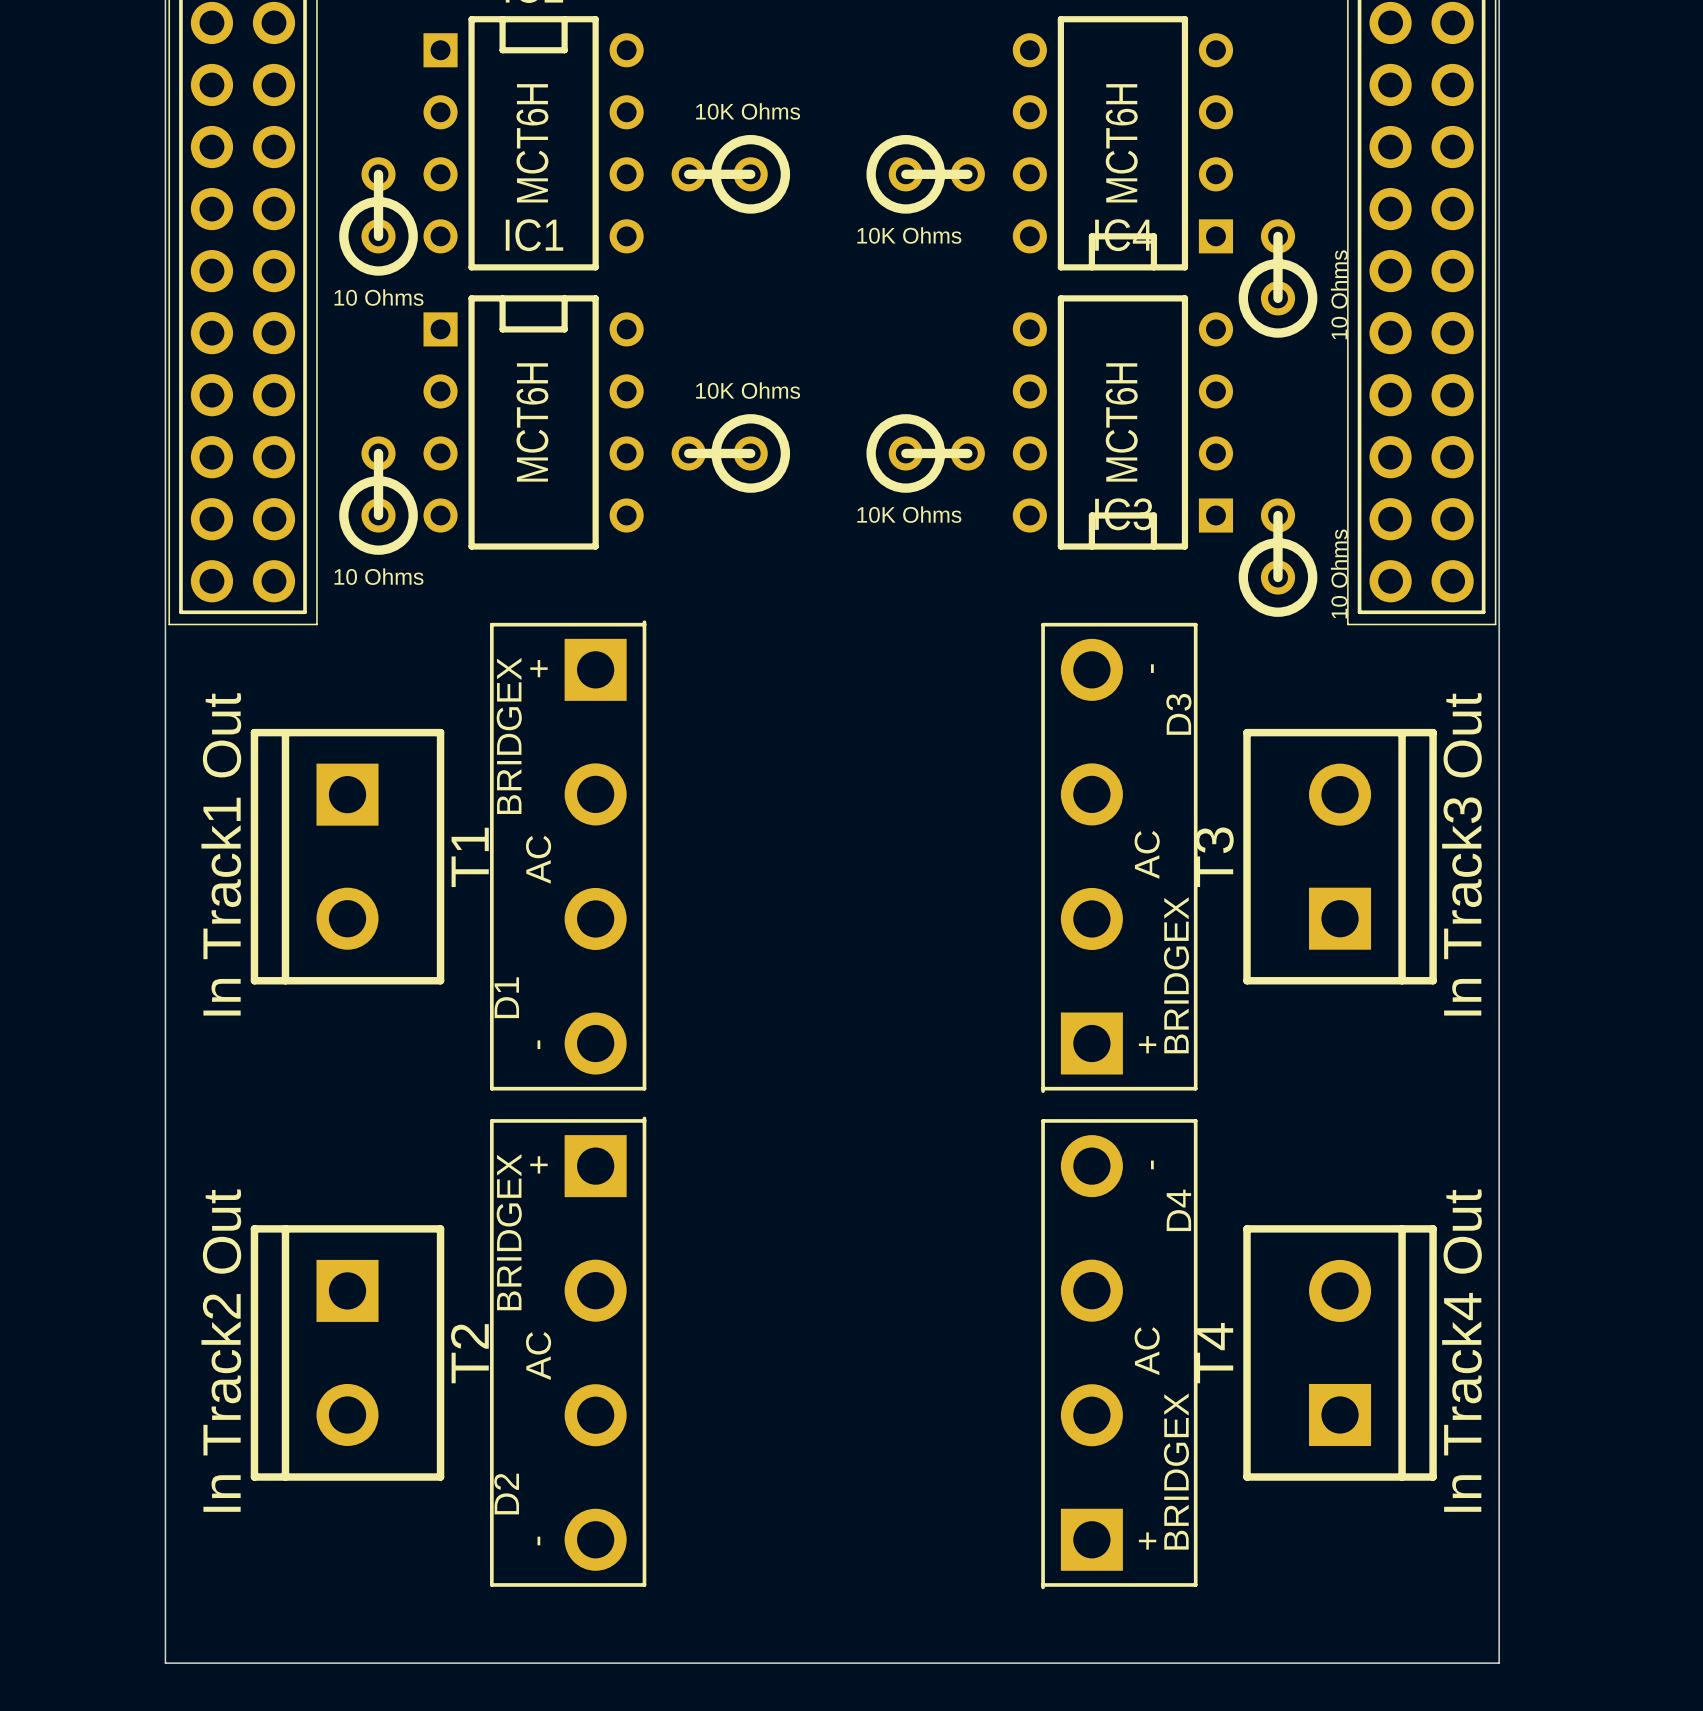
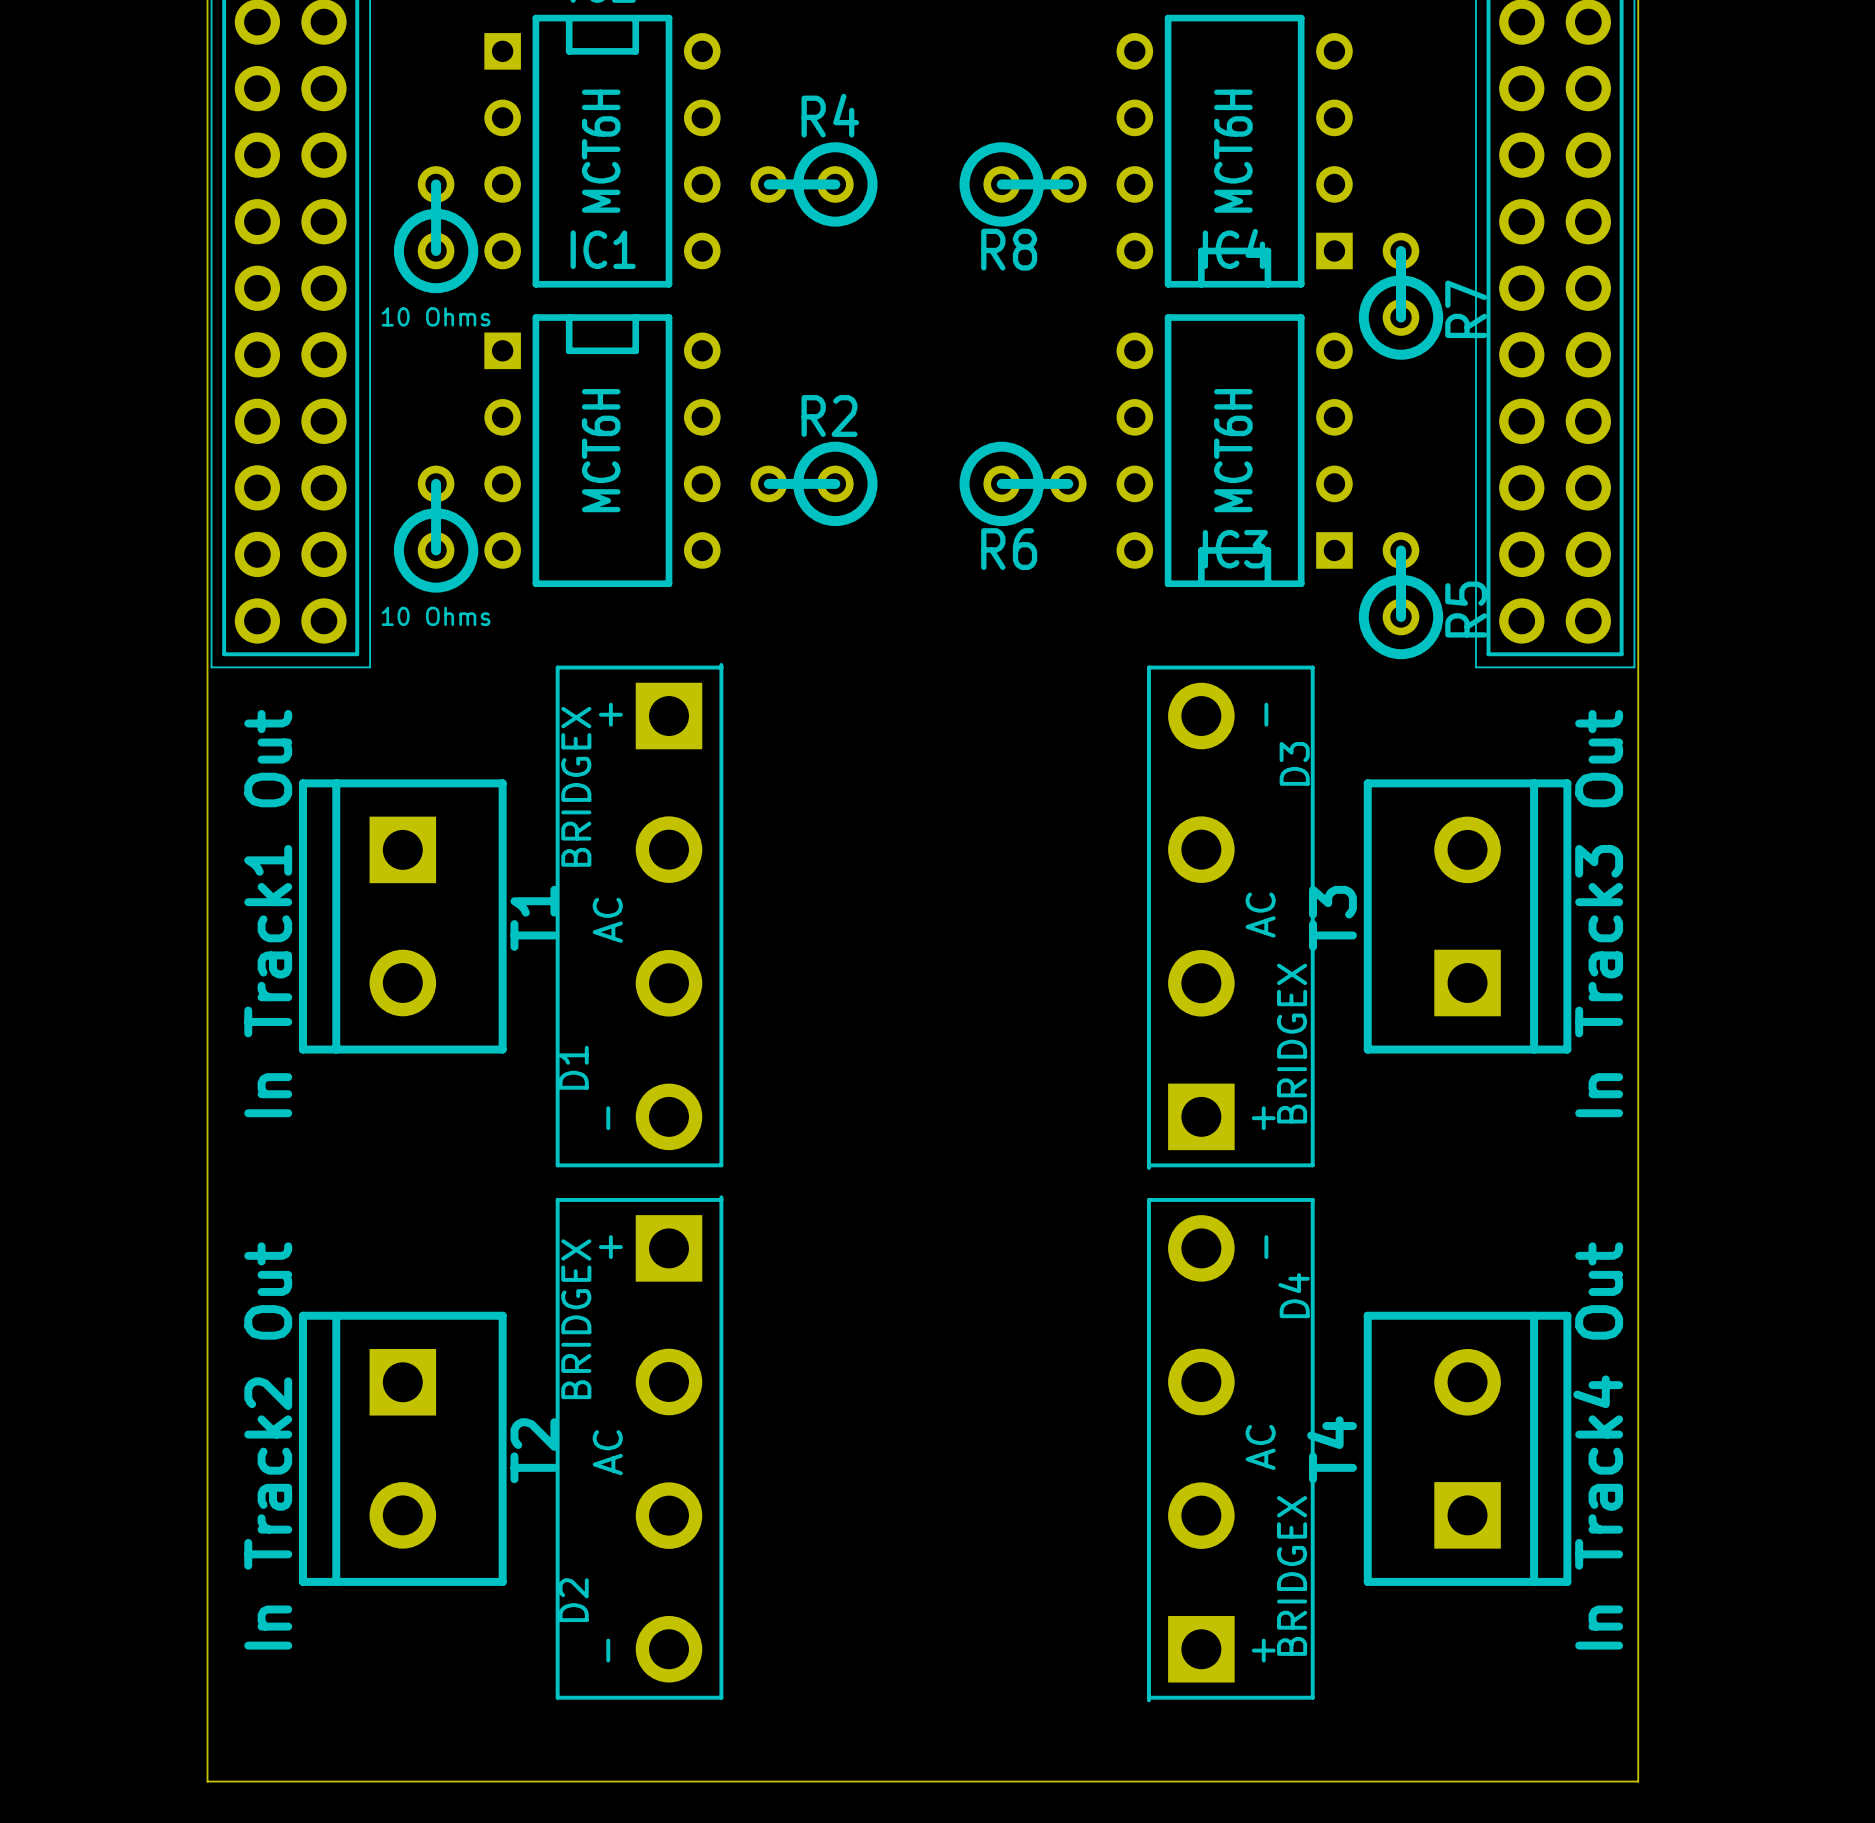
R4 name: none -> R4 (830, 115)
R4 value: 10K Ohms (748, 111) -> none
R8 value: 10K Ohms (909, 235) -> none
R8 name: none -> R8 (1009, 249)
R7 name: none -> R7 (1466, 309)
R7 value: 10 Ohms (1339, 294) -> none
R2 name: none -> R2 (829, 415)
R2 value: 10K Ohms (748, 390) -> none
R6 value: 10K Ohms (909, 514) -> none
R6 name: none -> R6 (1009, 549)
R5 name: none -> R5 (1466, 609)
R5 value: 10 Ohms (1339, 573) -> none

